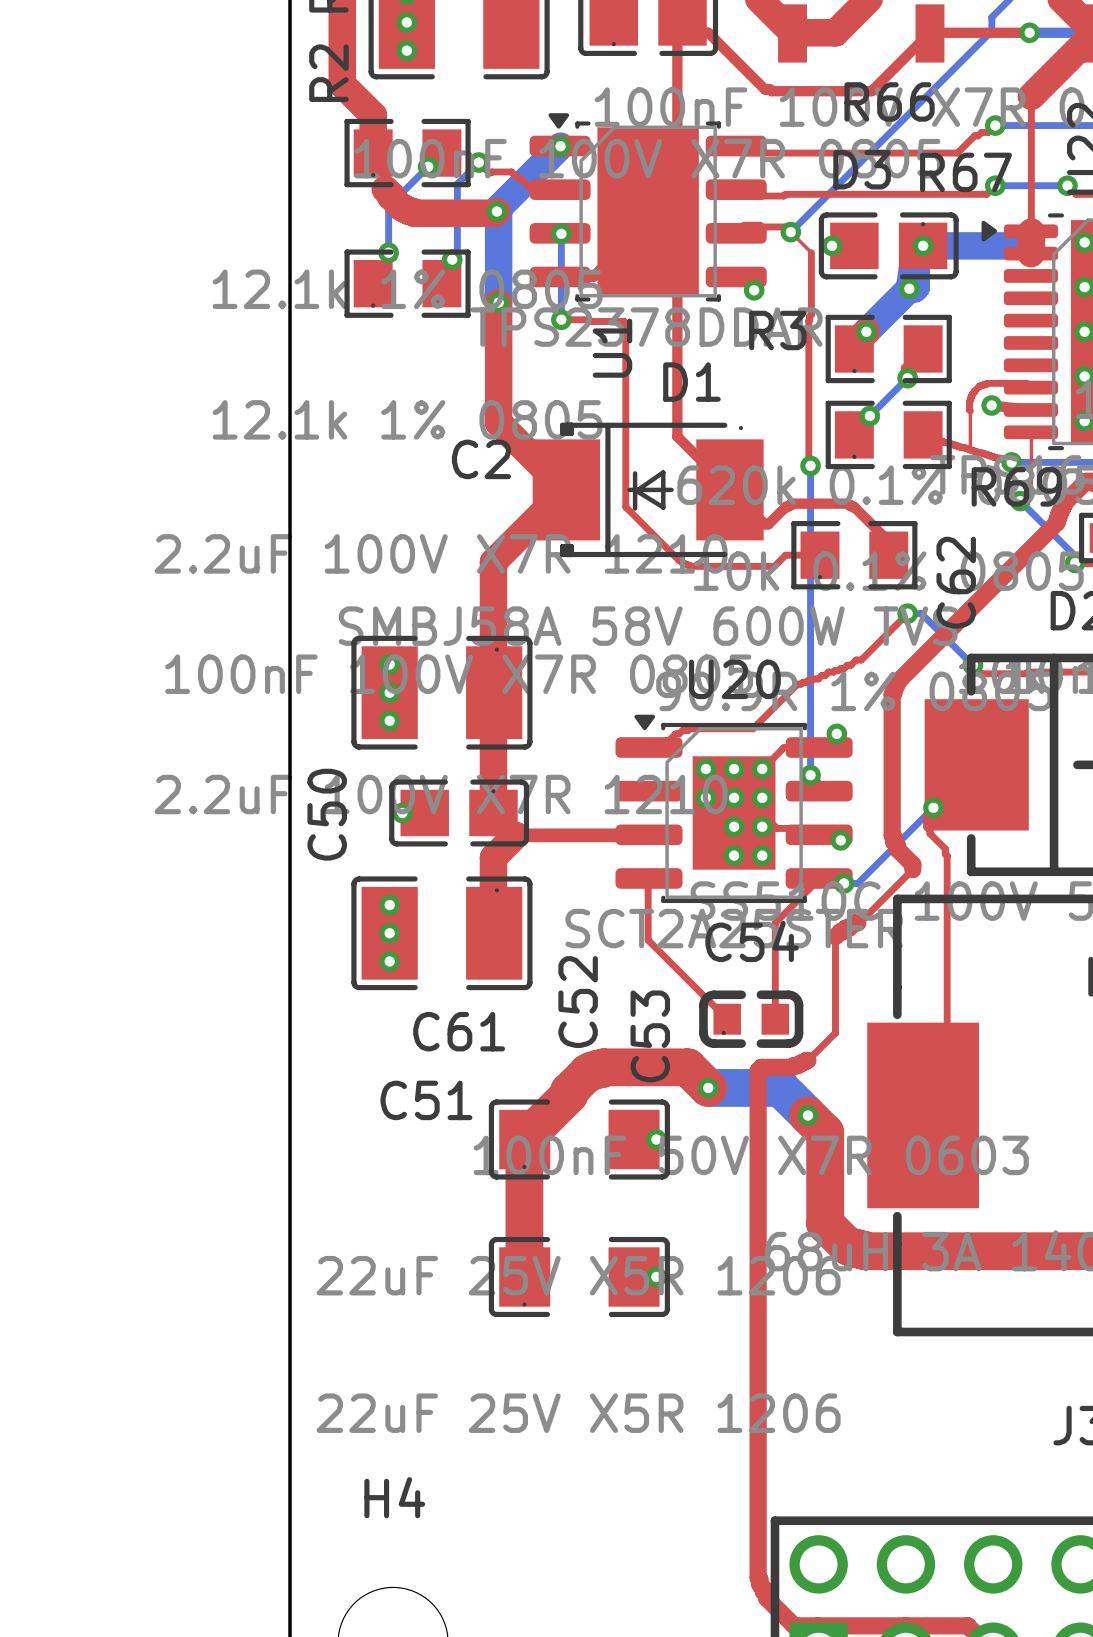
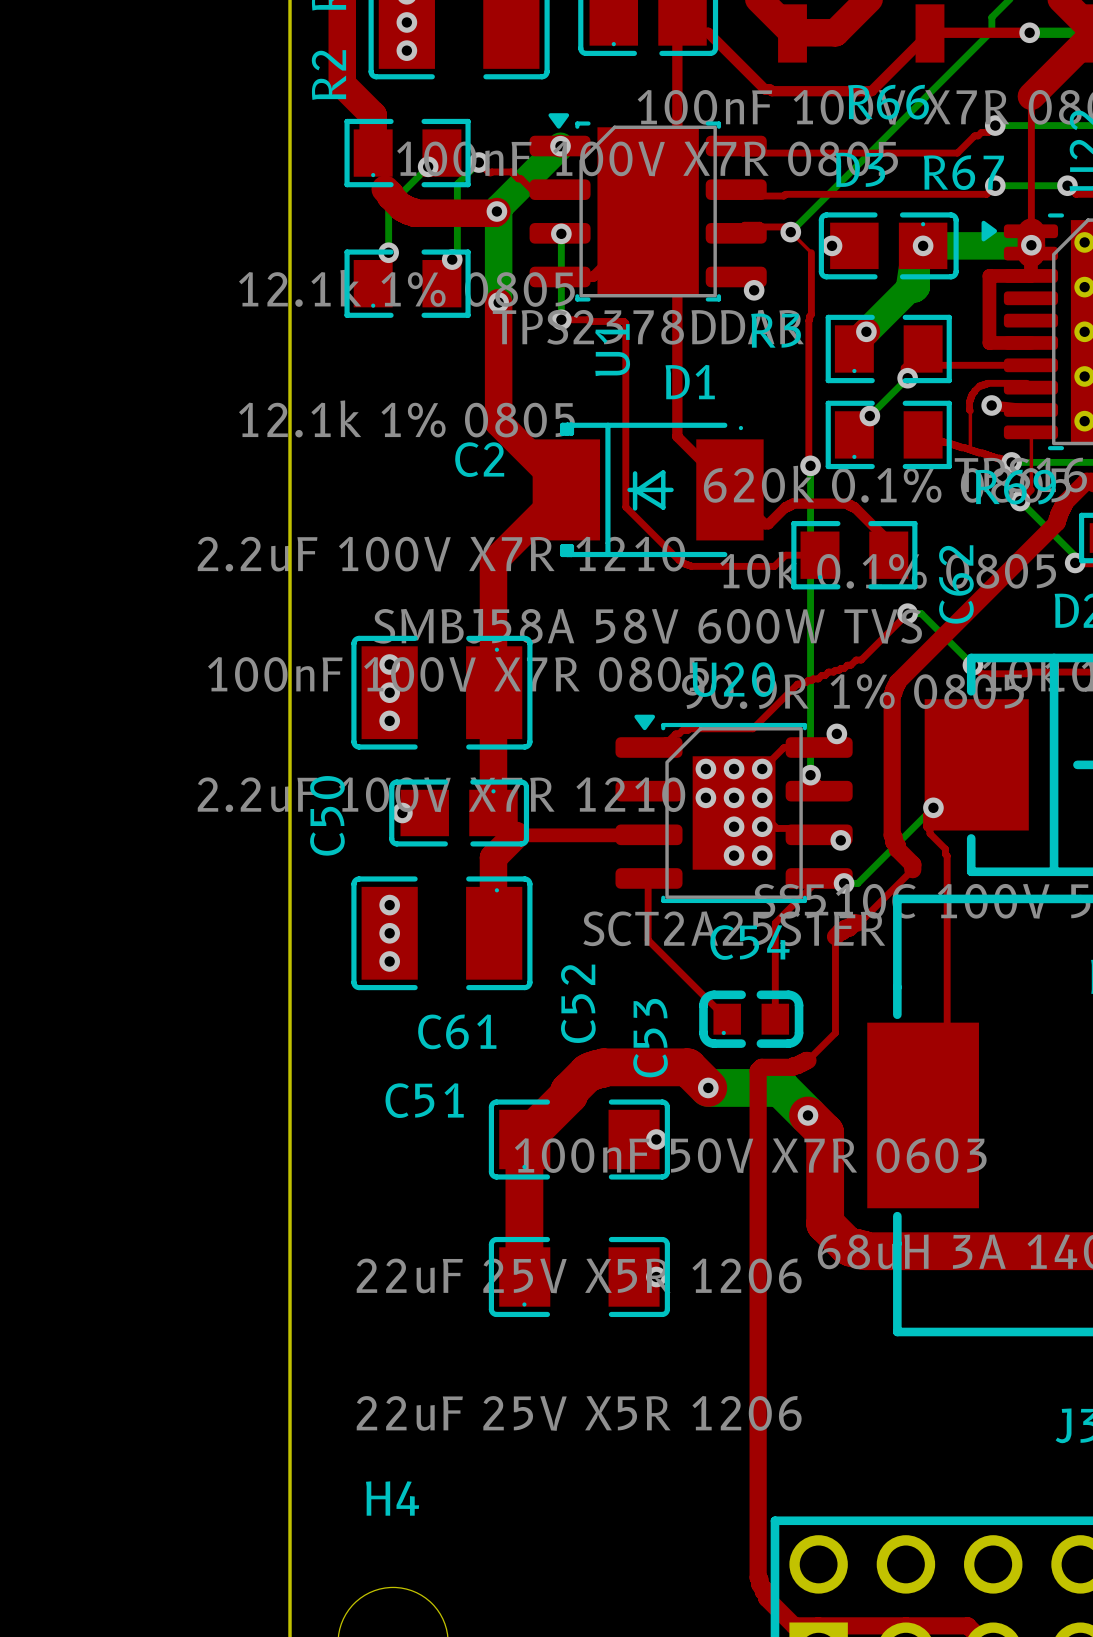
top track: none -> (1030, 253) (1030, 275) (989, 275) (989, 342) (1030, 342)
via position: (909, 288) -> (1031, 245)
top track: none -> (923, 348) (940, 365) (1030, 365)

